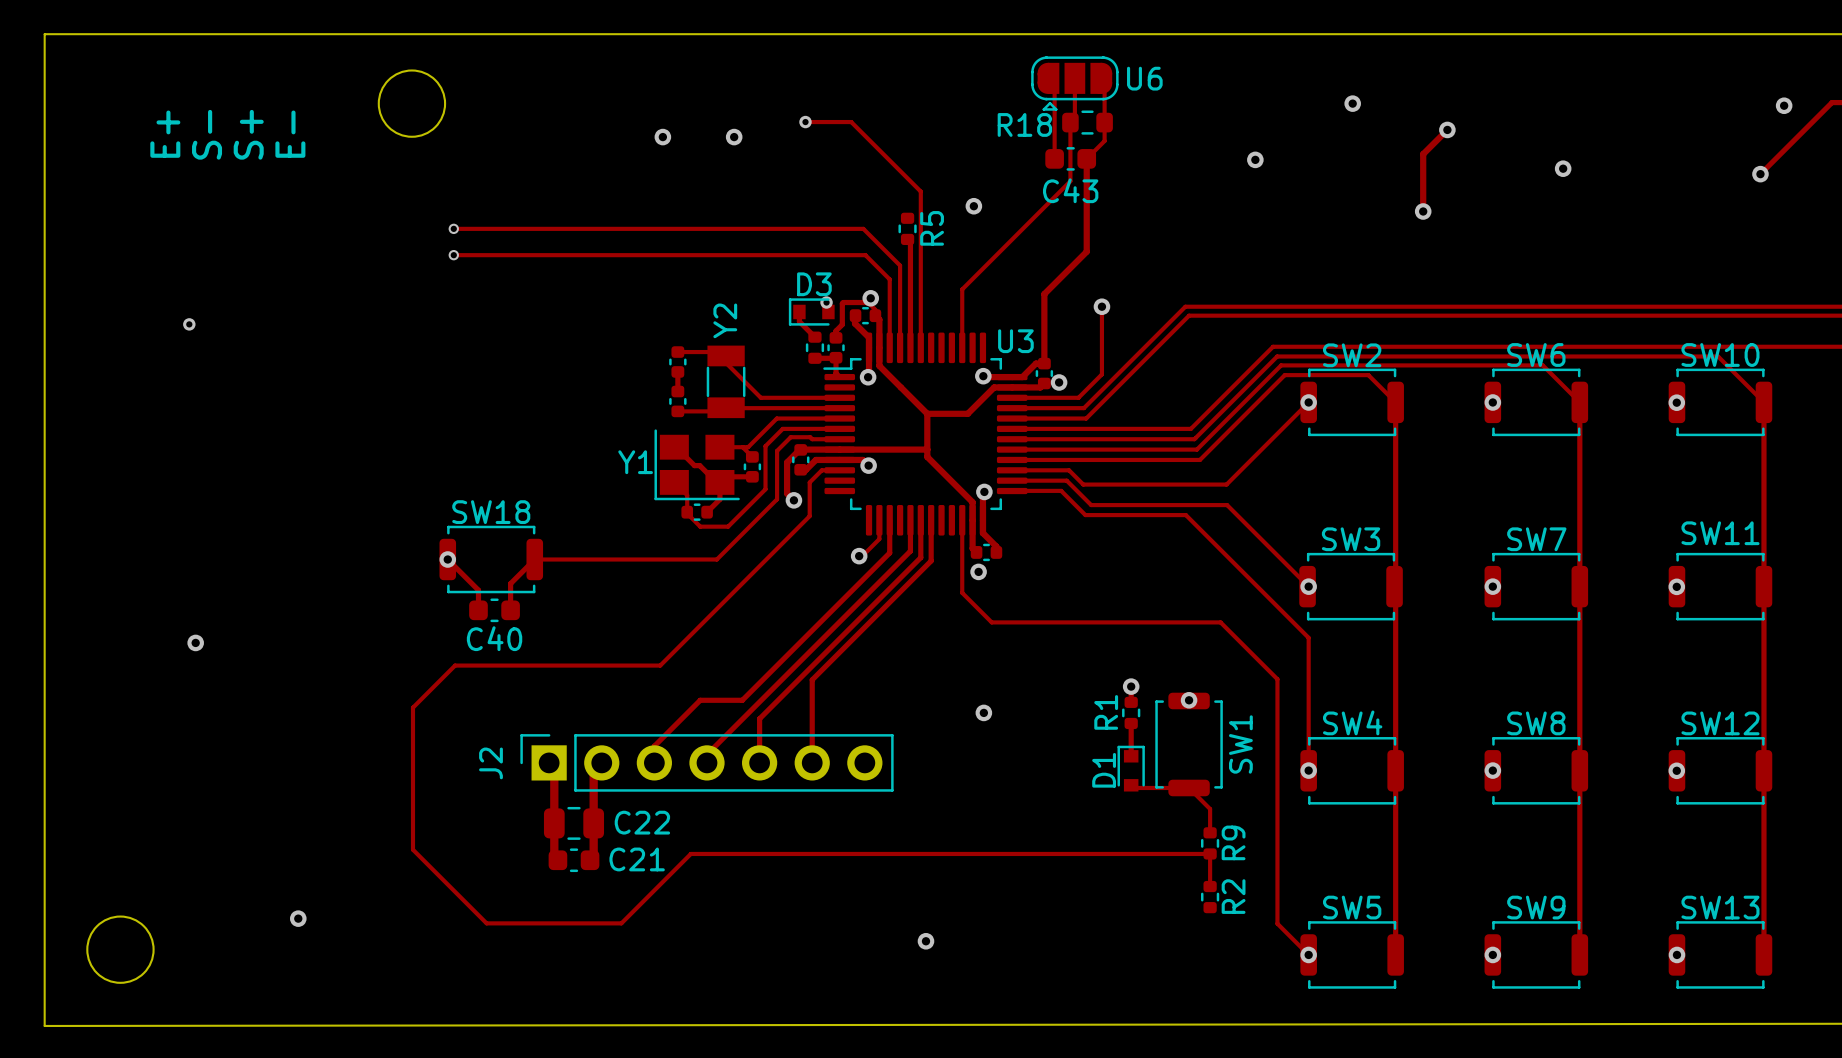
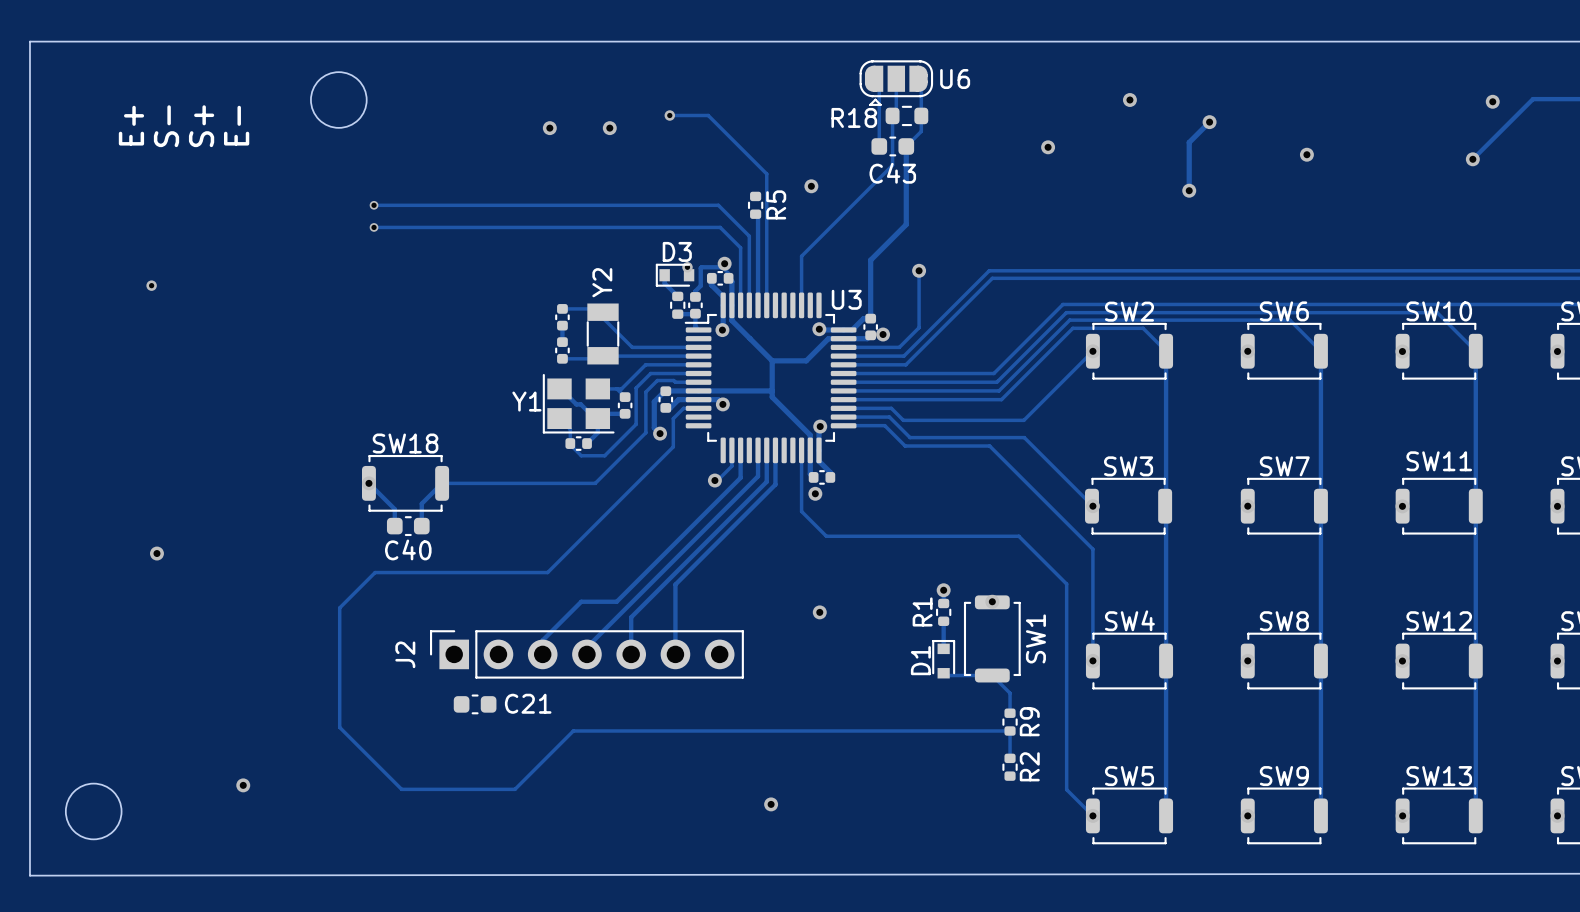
track: (554, 768) (554, 856) (557, 860) -> none
track: (593, 771) (593, 856) (590, 860) -> none
C22: (573, 823) -> none
C21 position: (573, 860) -> (475, 704)

